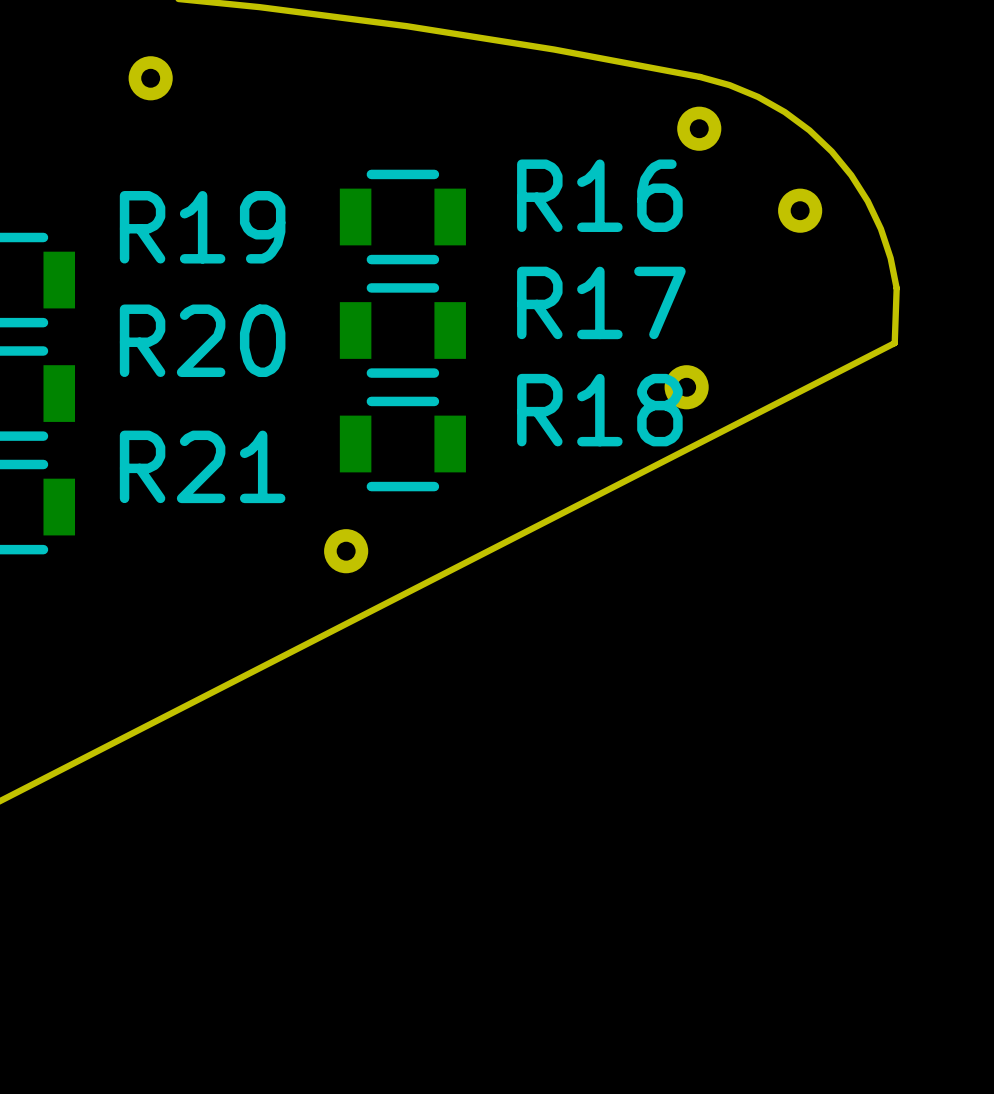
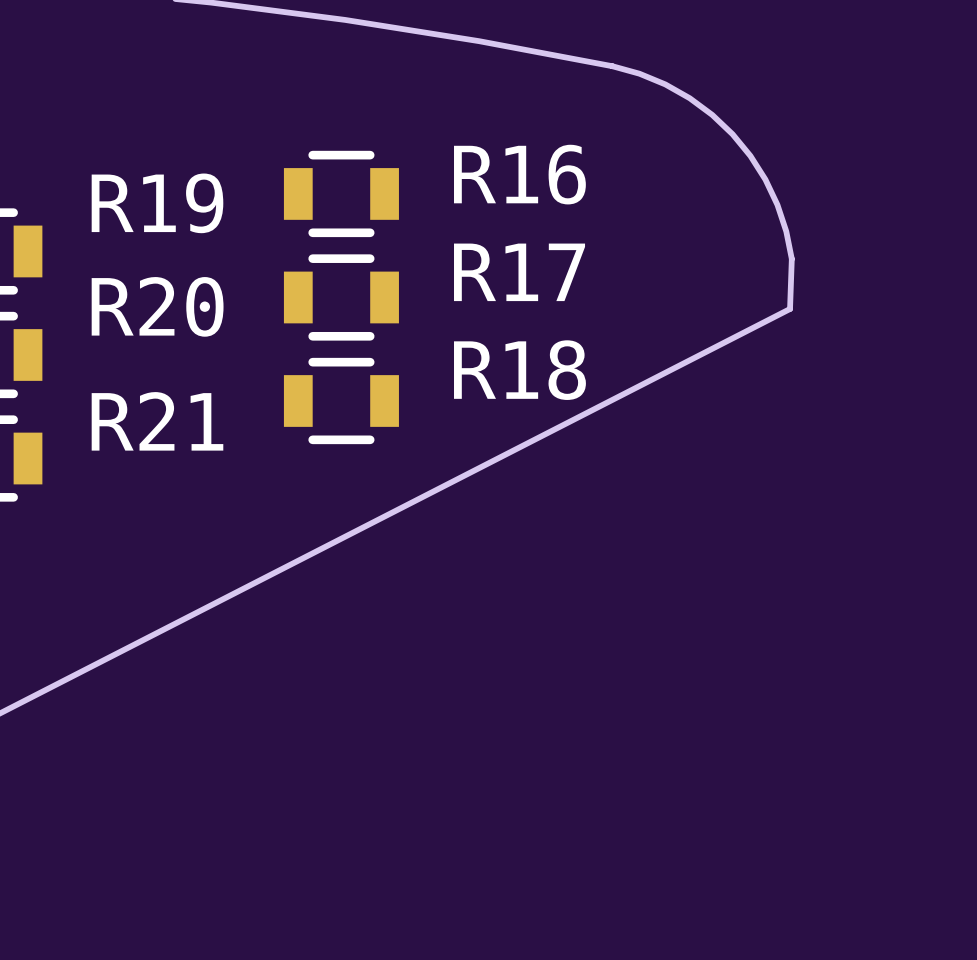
part: (150, 78) -> none
part: (699, 128) -> none
part: (800, 210) -> none
part: (686, 387) -> none
part: (346, 551) -> none

